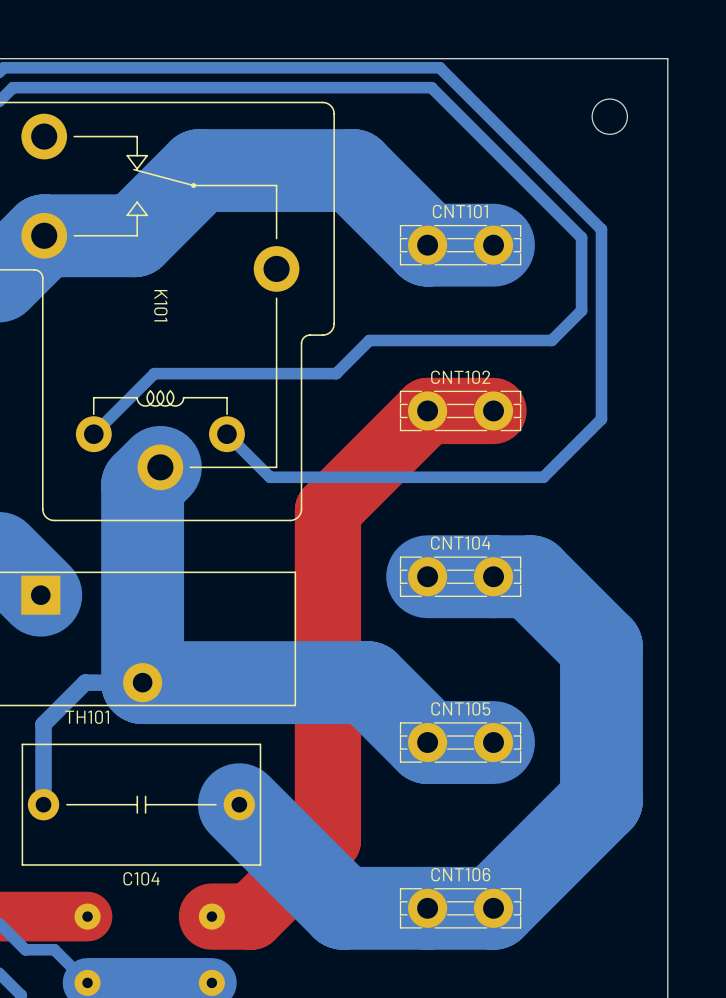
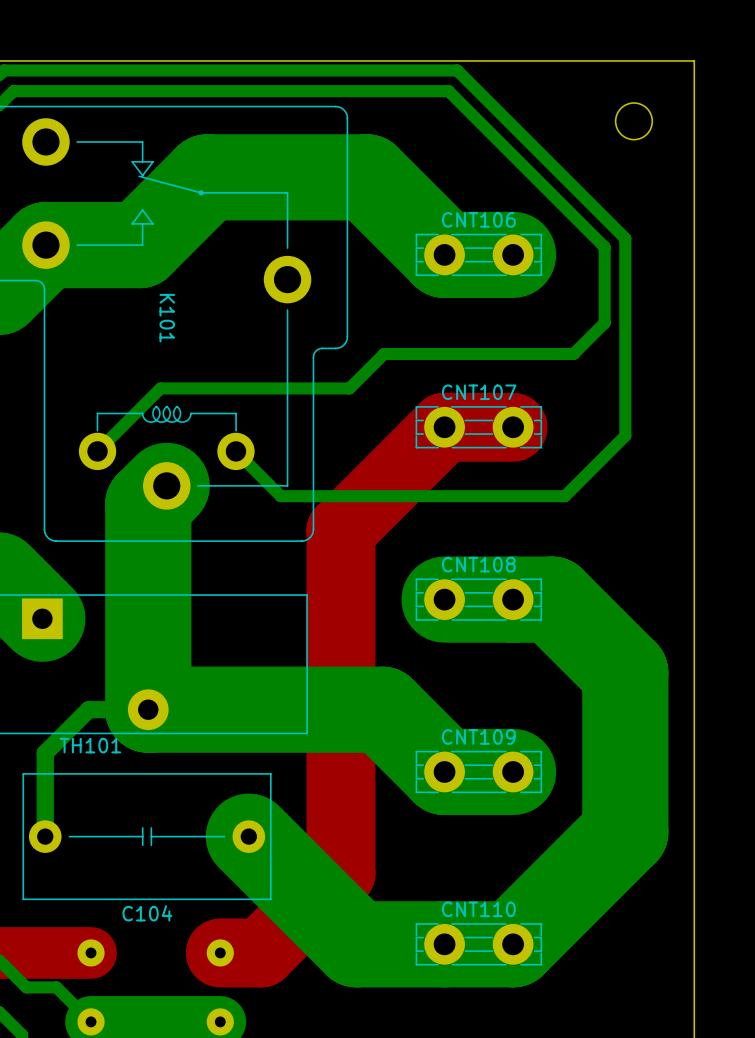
CNT101 name: CNT101 (460, 211) -> CNT106 (478, 219)
CNT102 name: CNT102 (460, 377) -> CNT107 (479, 392)
CNT104 name: CNT104 (460, 543) -> CNT108 (478, 564)
CNT105 name: CNT105 (460, 708) -> CNT109 (478, 737)
CNT106 name: CNT106 (460, 874) -> CNT110 (478, 909)

